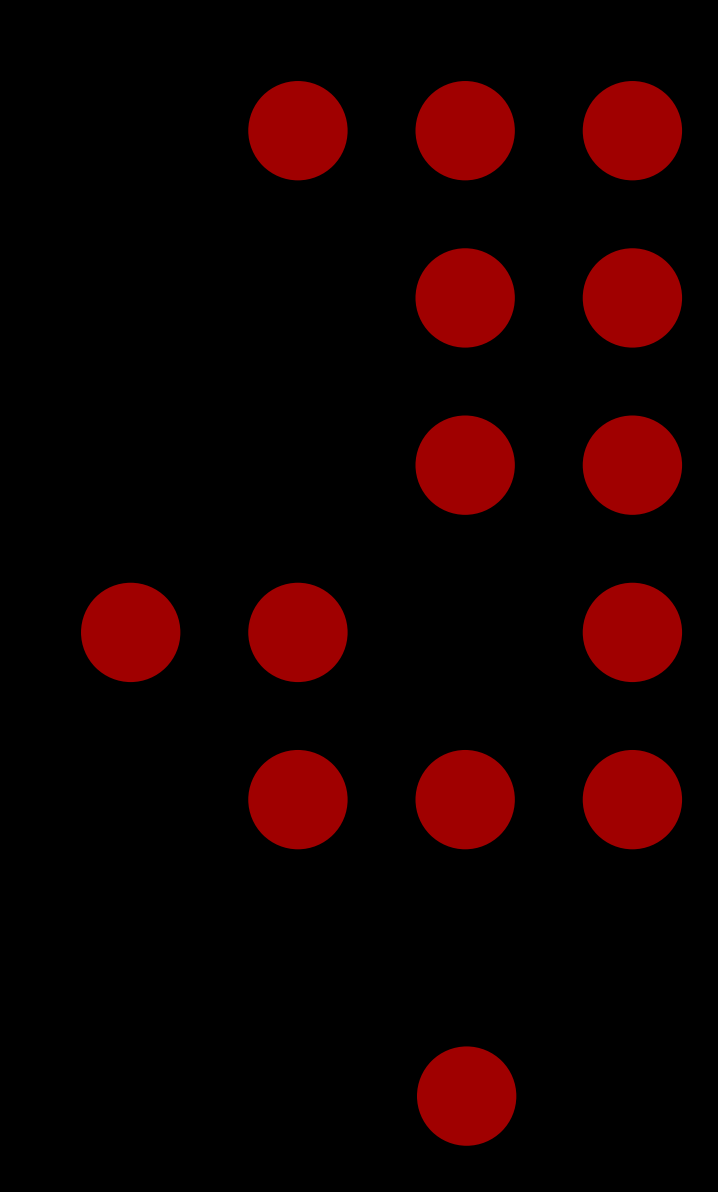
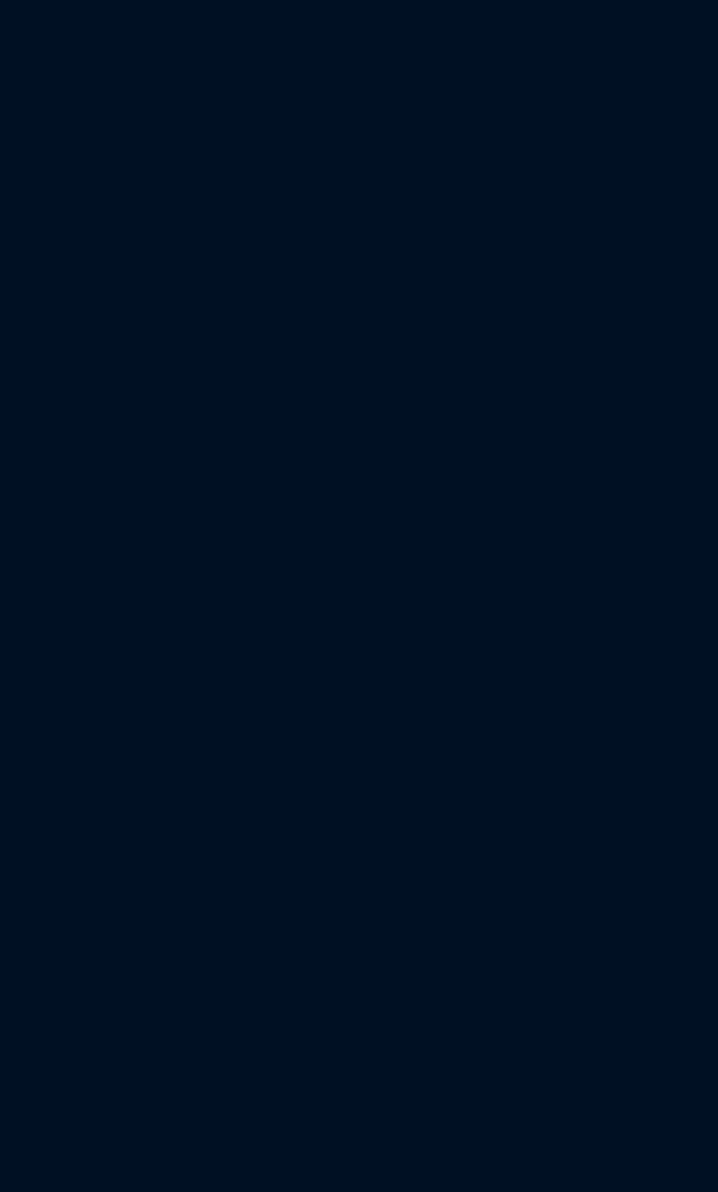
part: (297, 130) -> none
part: (465, 130) -> none
part: (632, 130) -> none
part: (465, 297) -> none
part: (632, 297) -> none
part: (465, 465) -> none
part: (632, 465) -> none
part: (130, 632) -> none
part: (297, 632) -> none
part: (632, 632) -> none
part: (297, 799) -> none
part: (465, 799) -> none
part: (632, 799) -> none
part: (466, 1096) -> none

